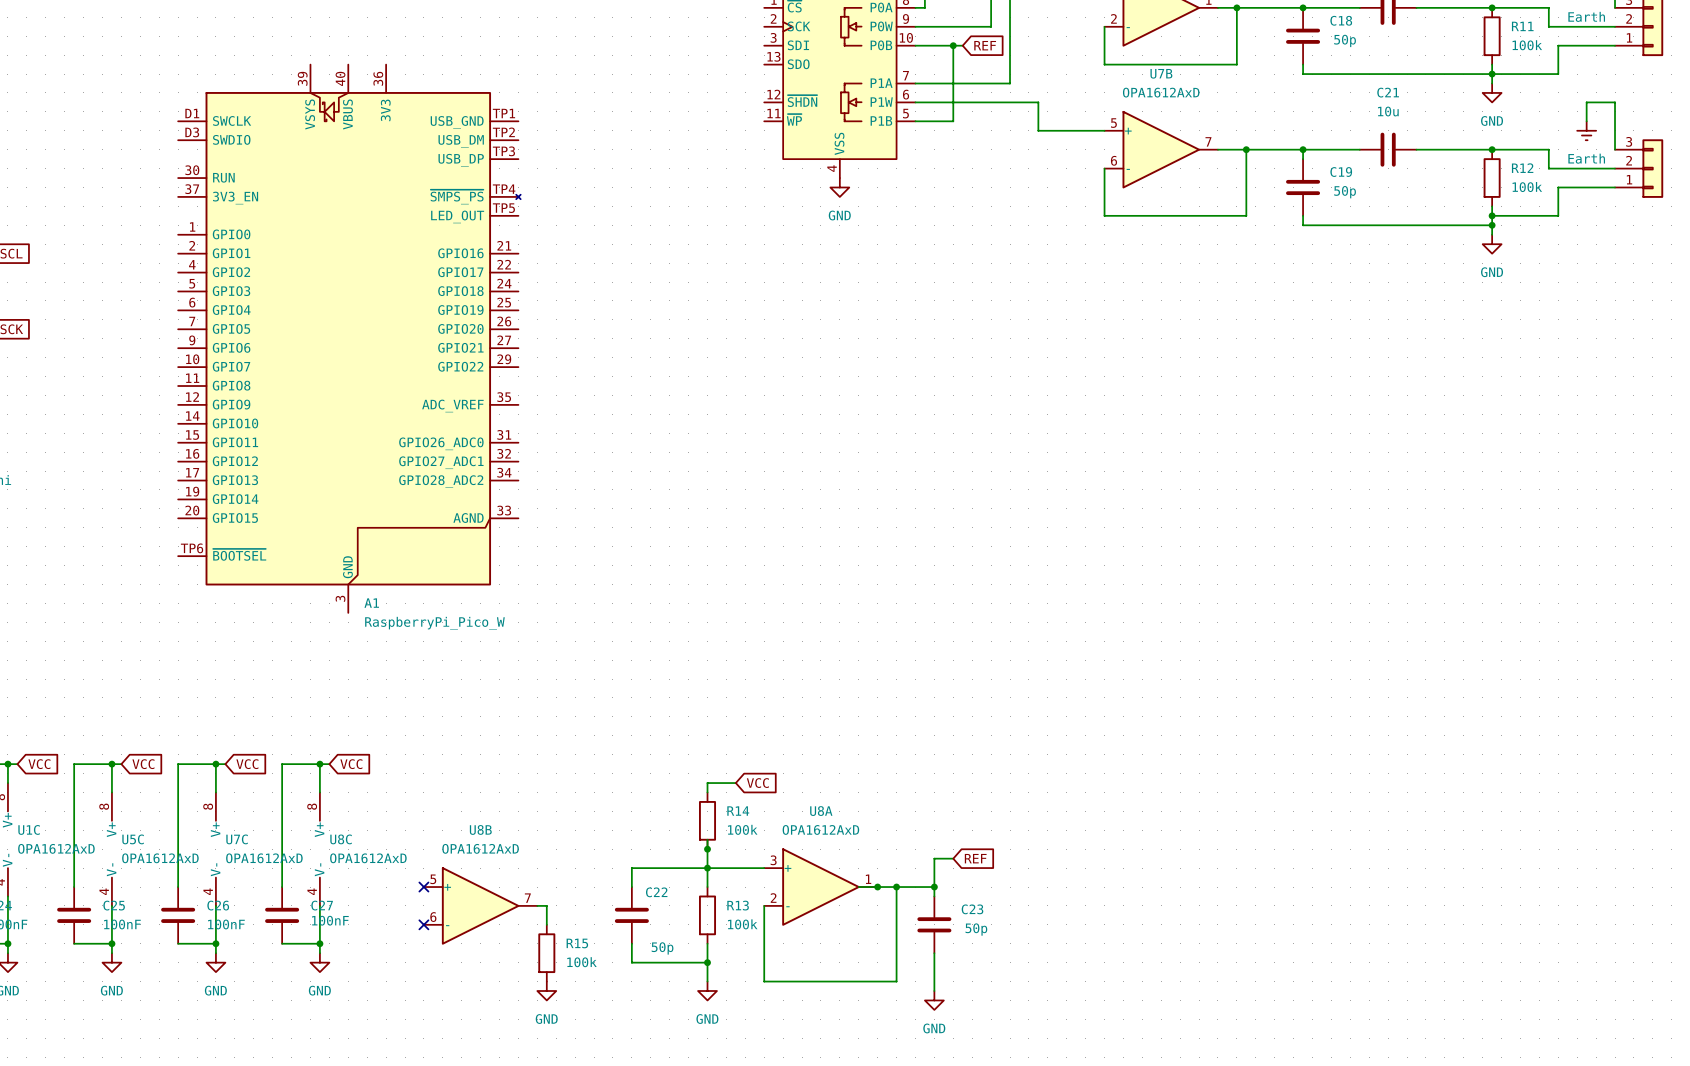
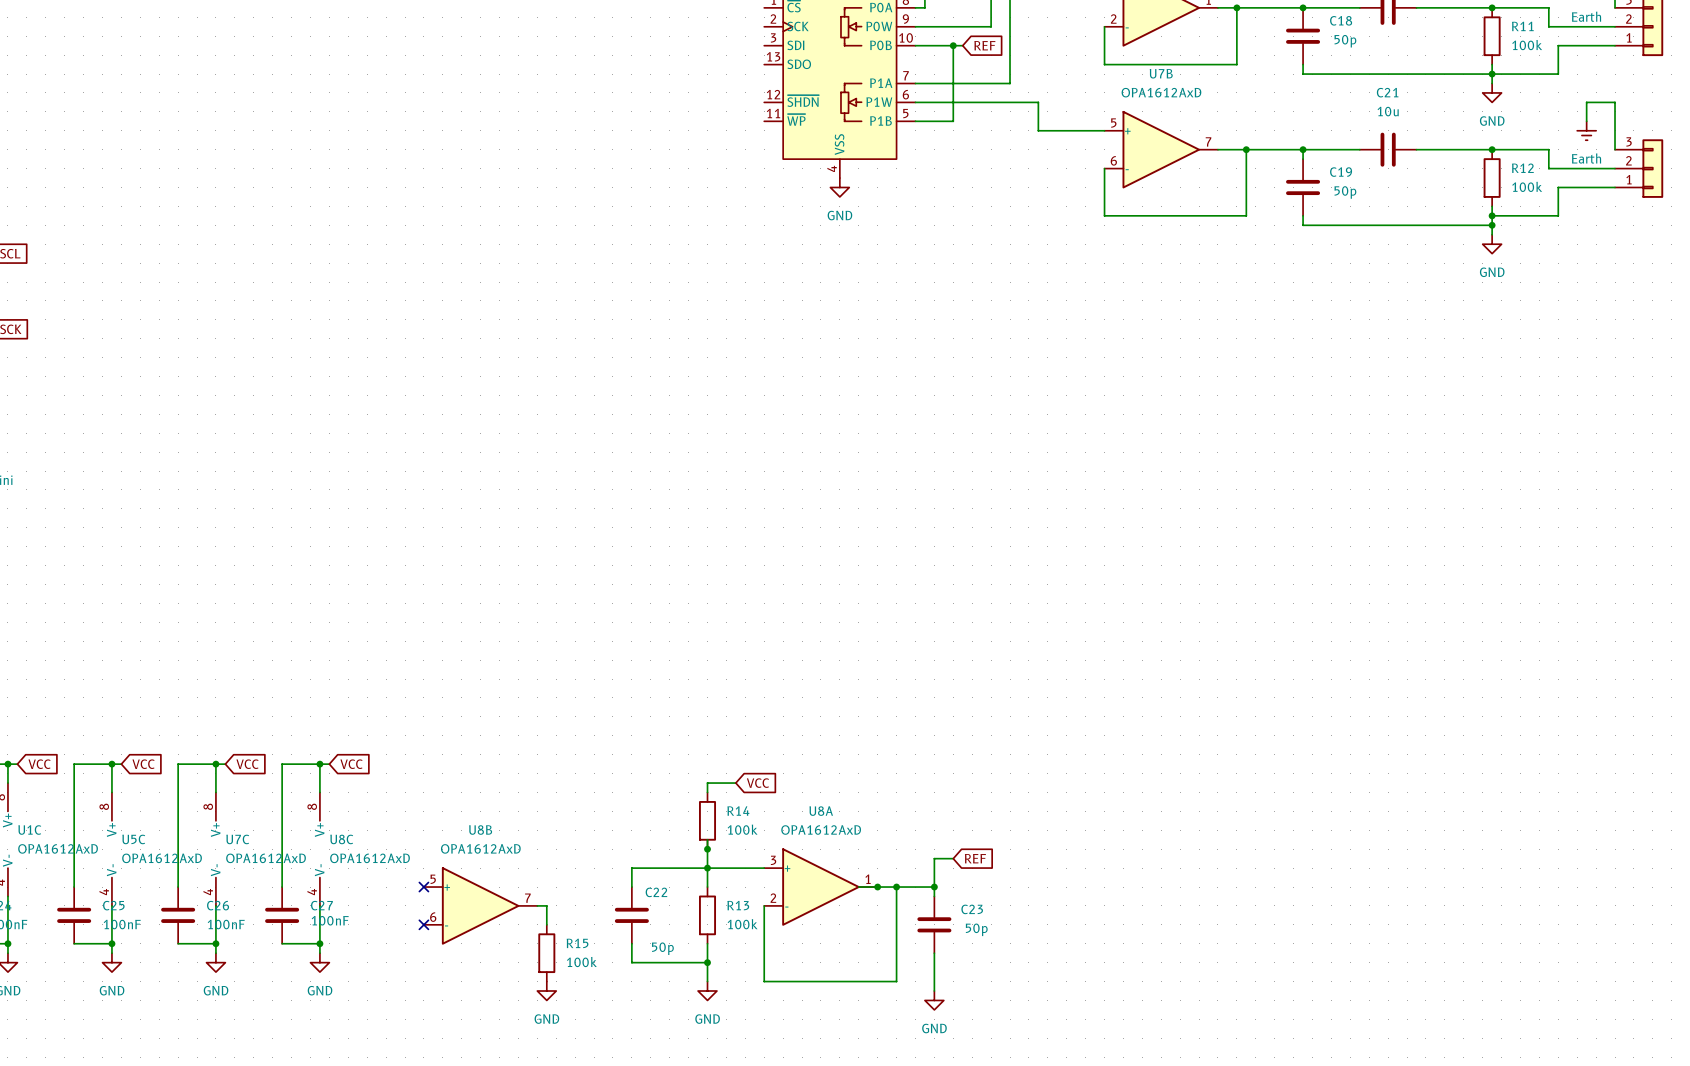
A1: RaspberryPi_Pico_W (349, 338) -> none

